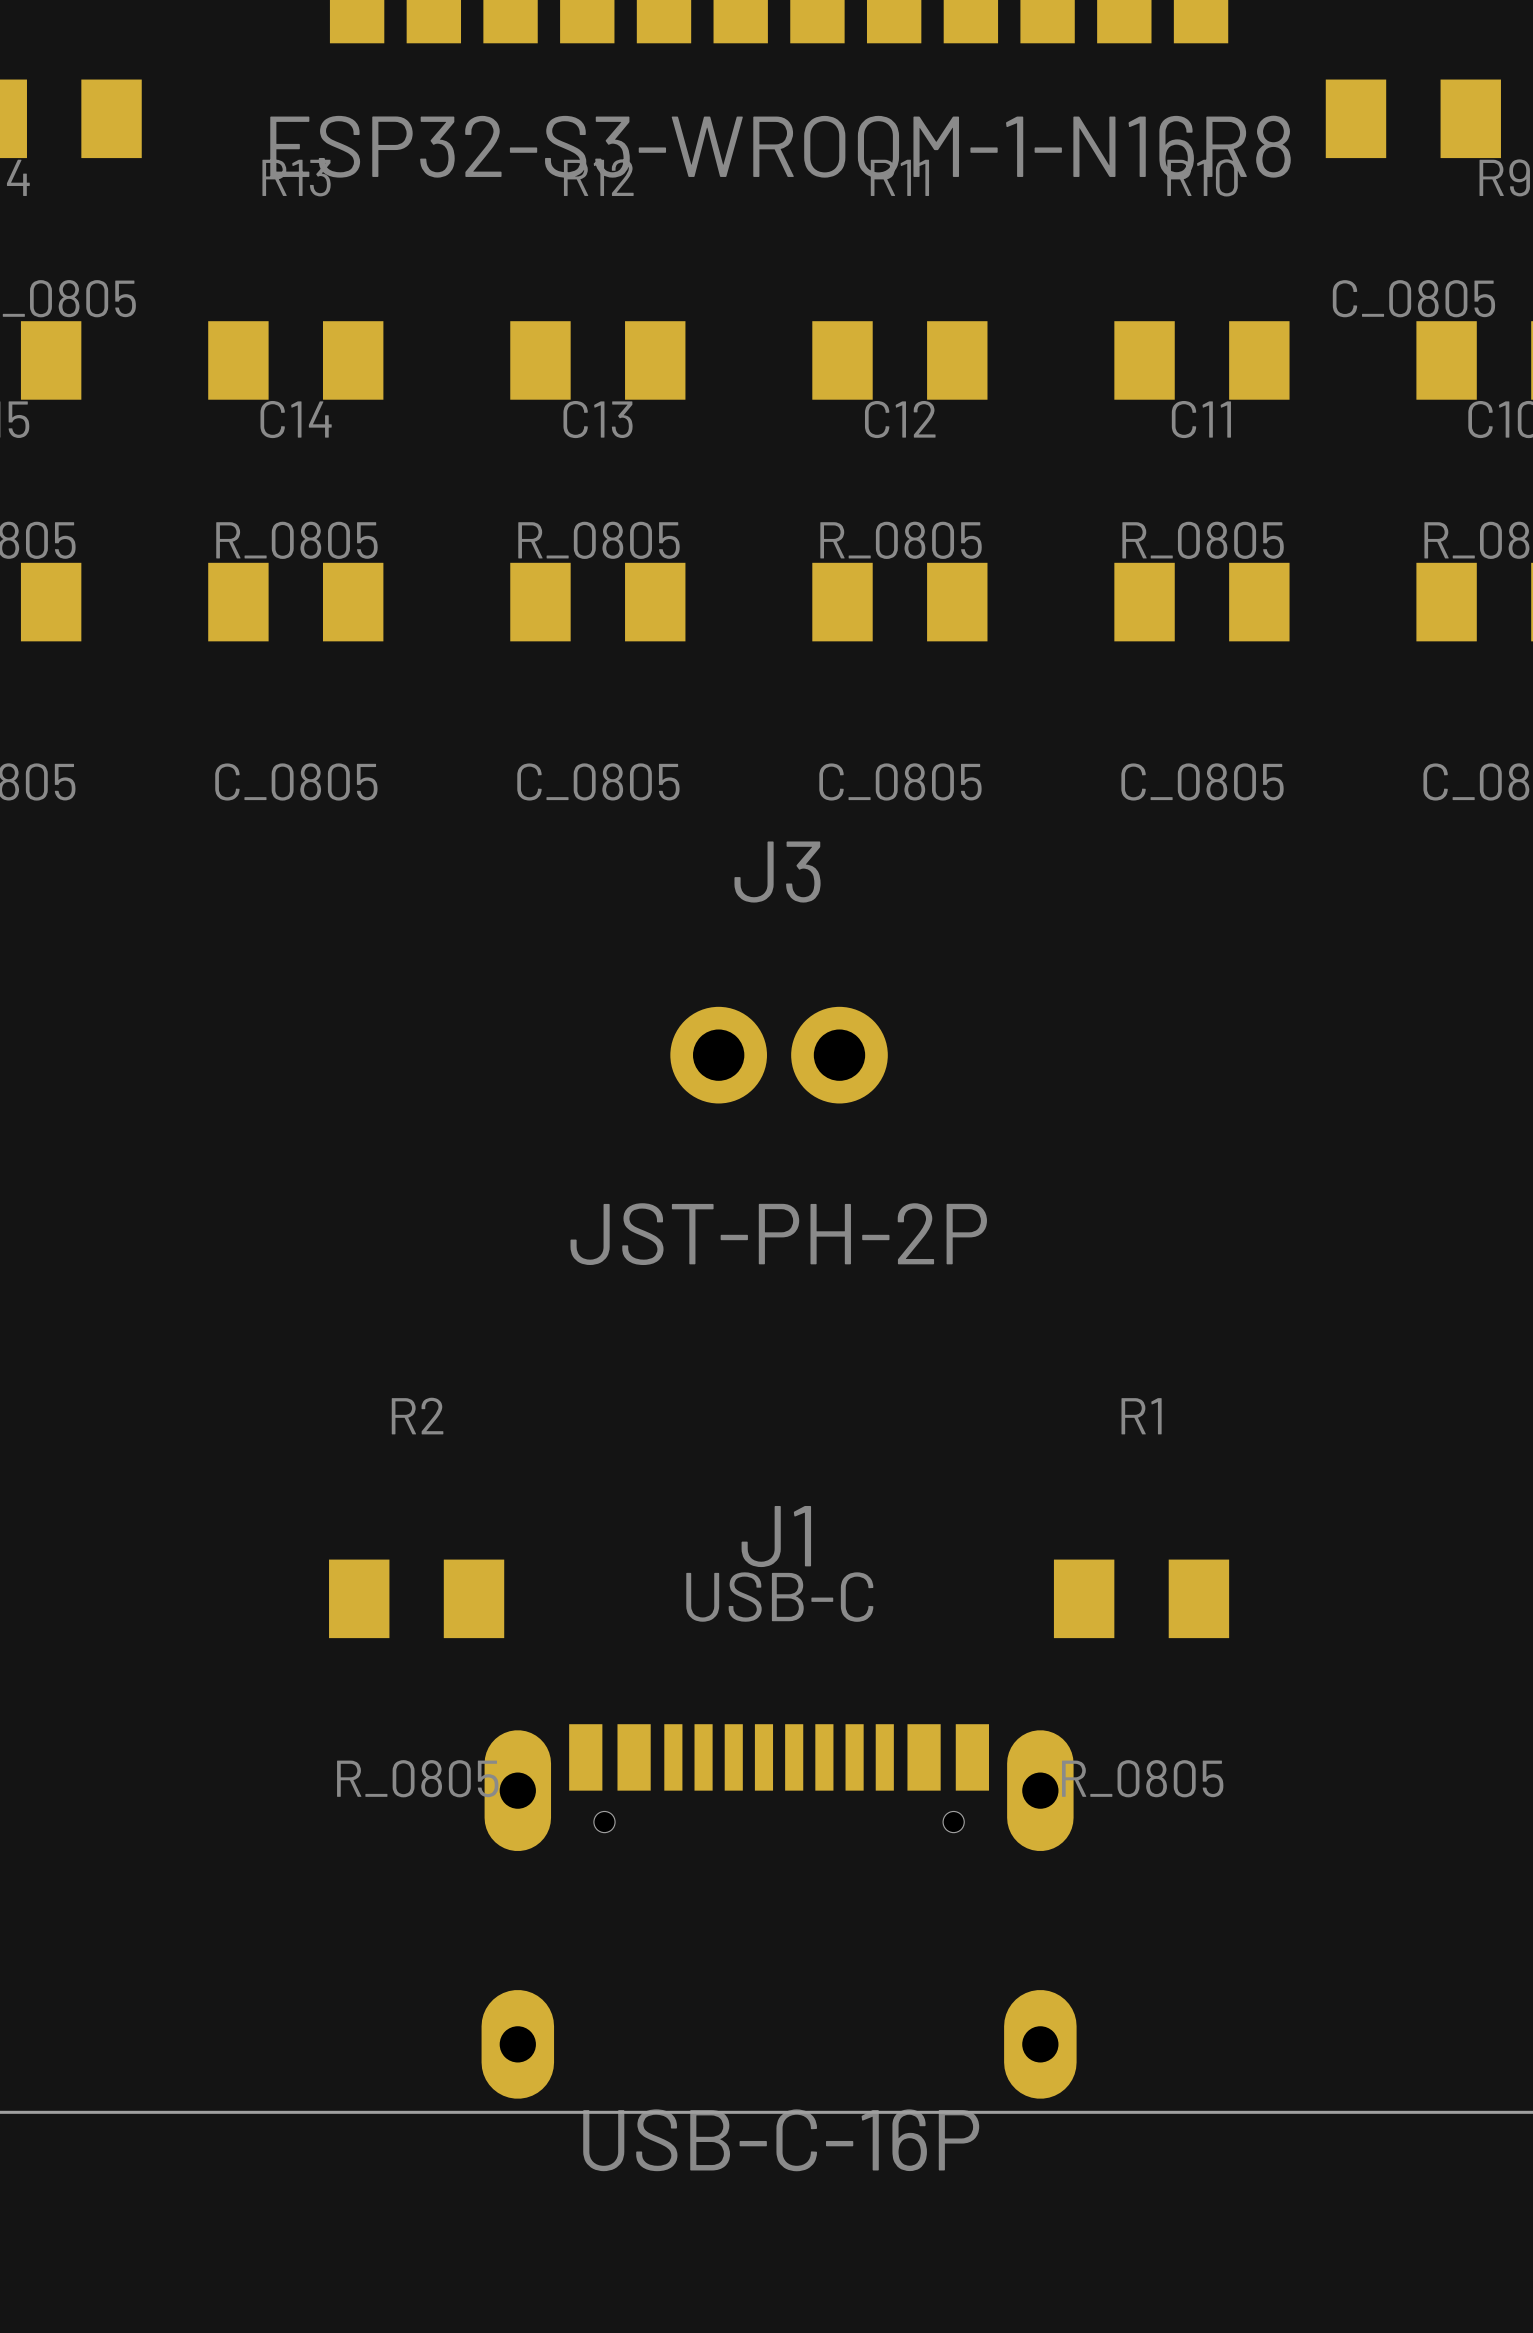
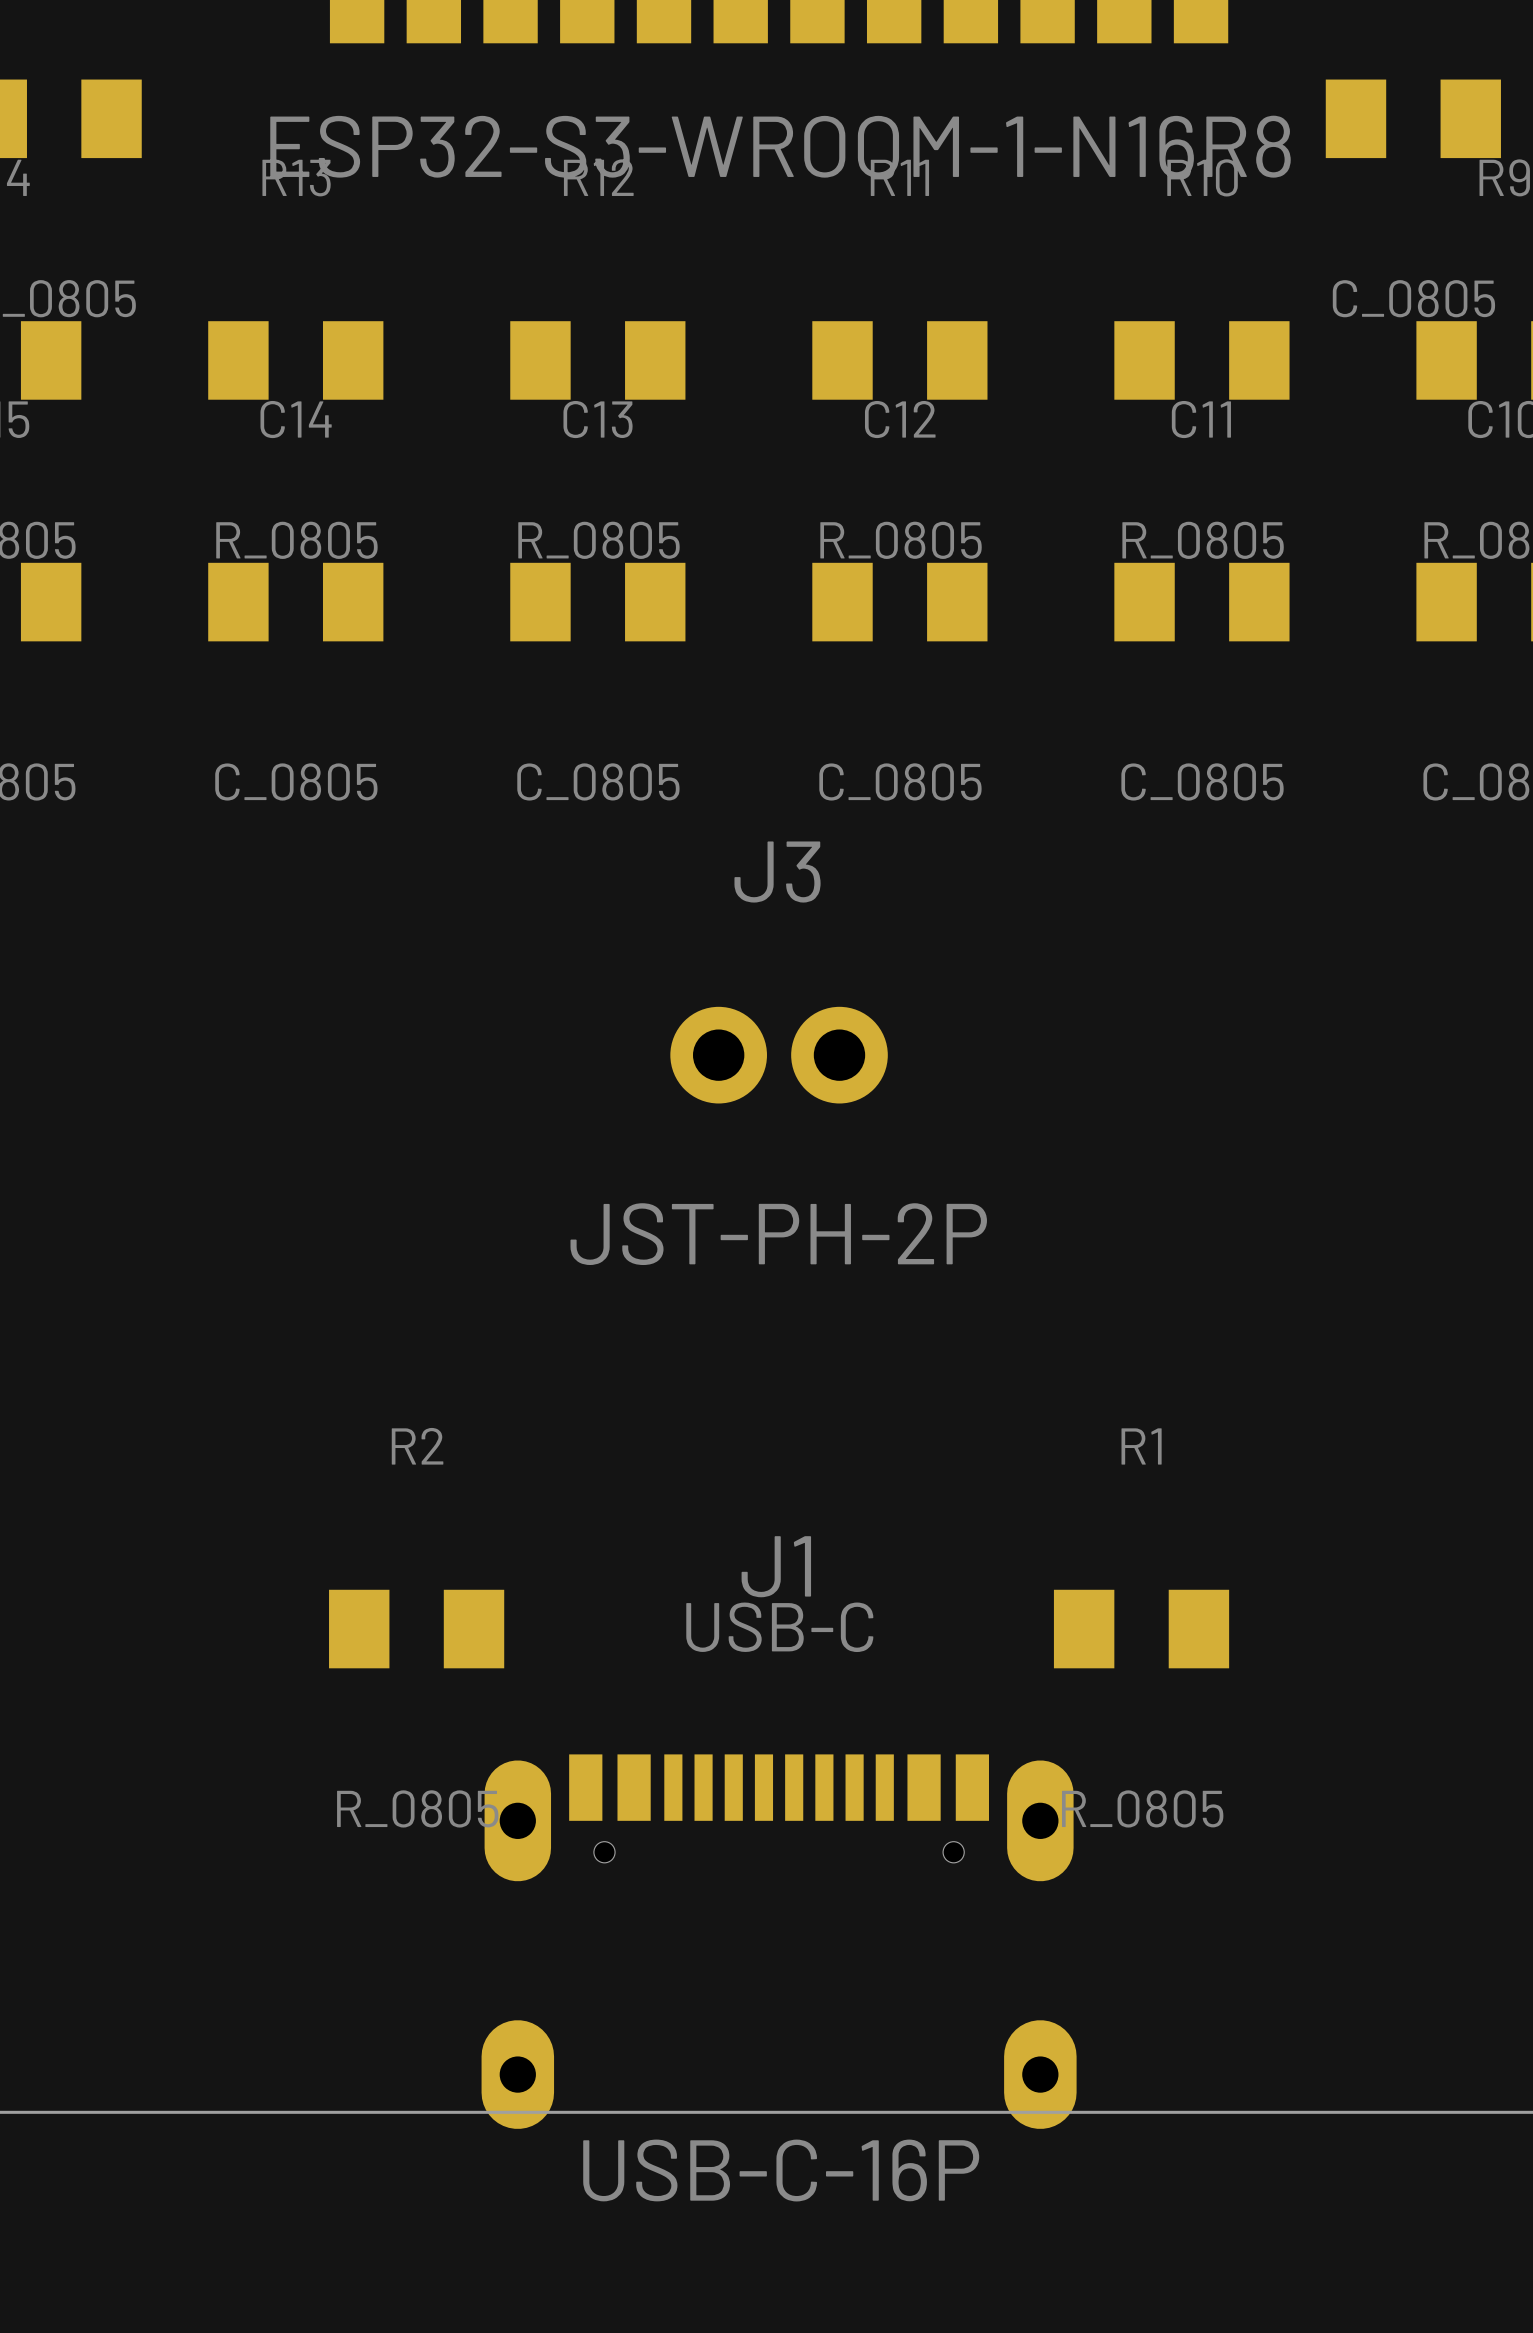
text position: USB-C (779, 1597) -> USB-C (779, 1627)
R2 position: (416, 1598) -> (416, 1629)
R1 position: (1141, 1598) -> (1141, 1629)
J1 position: (779, 1911) -> (779, 1941)

